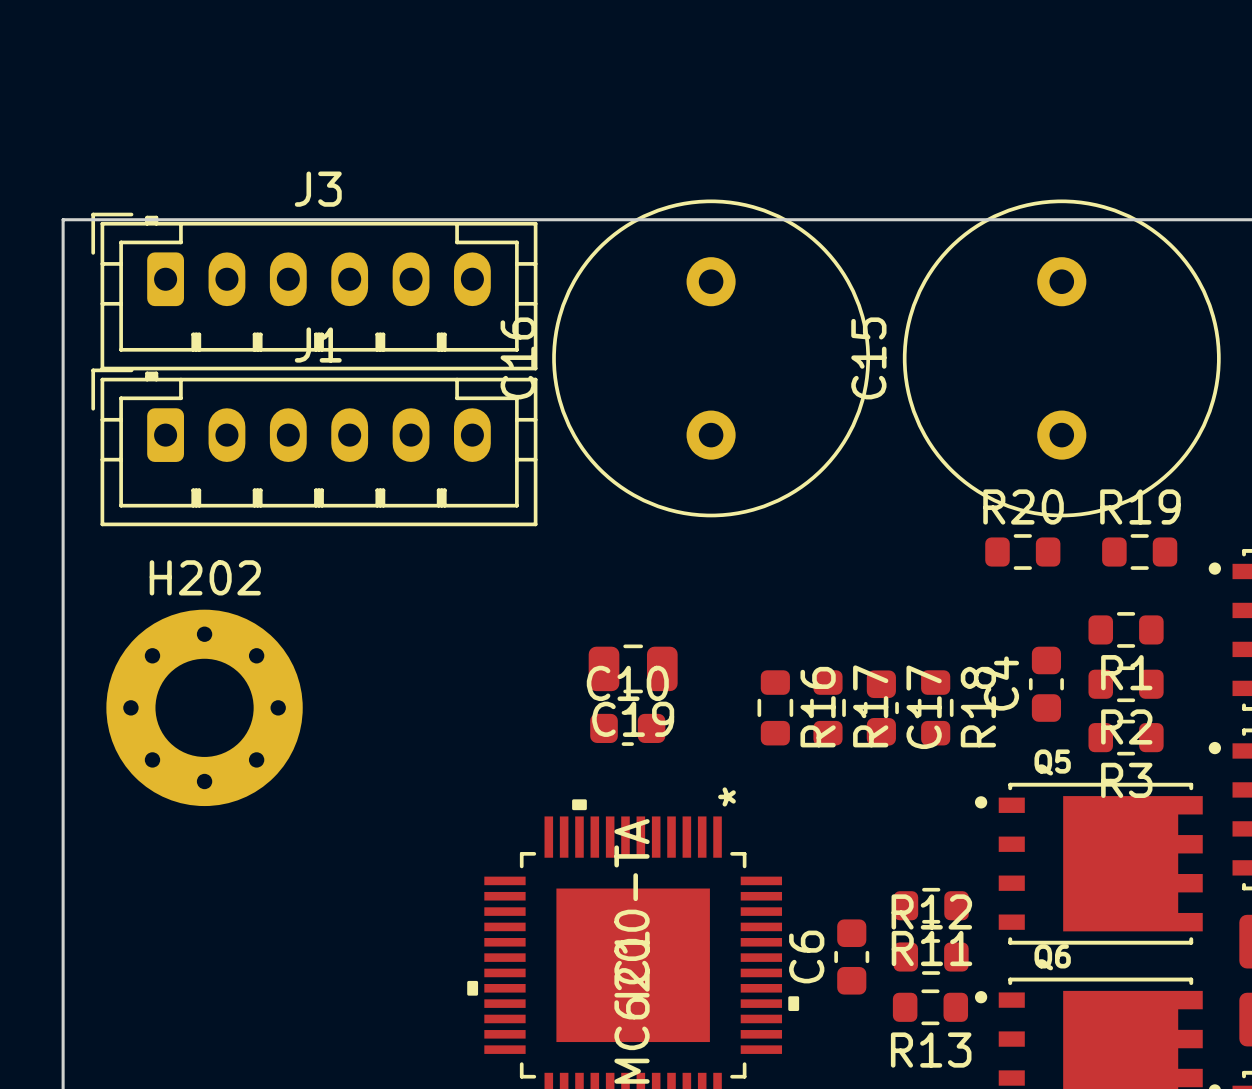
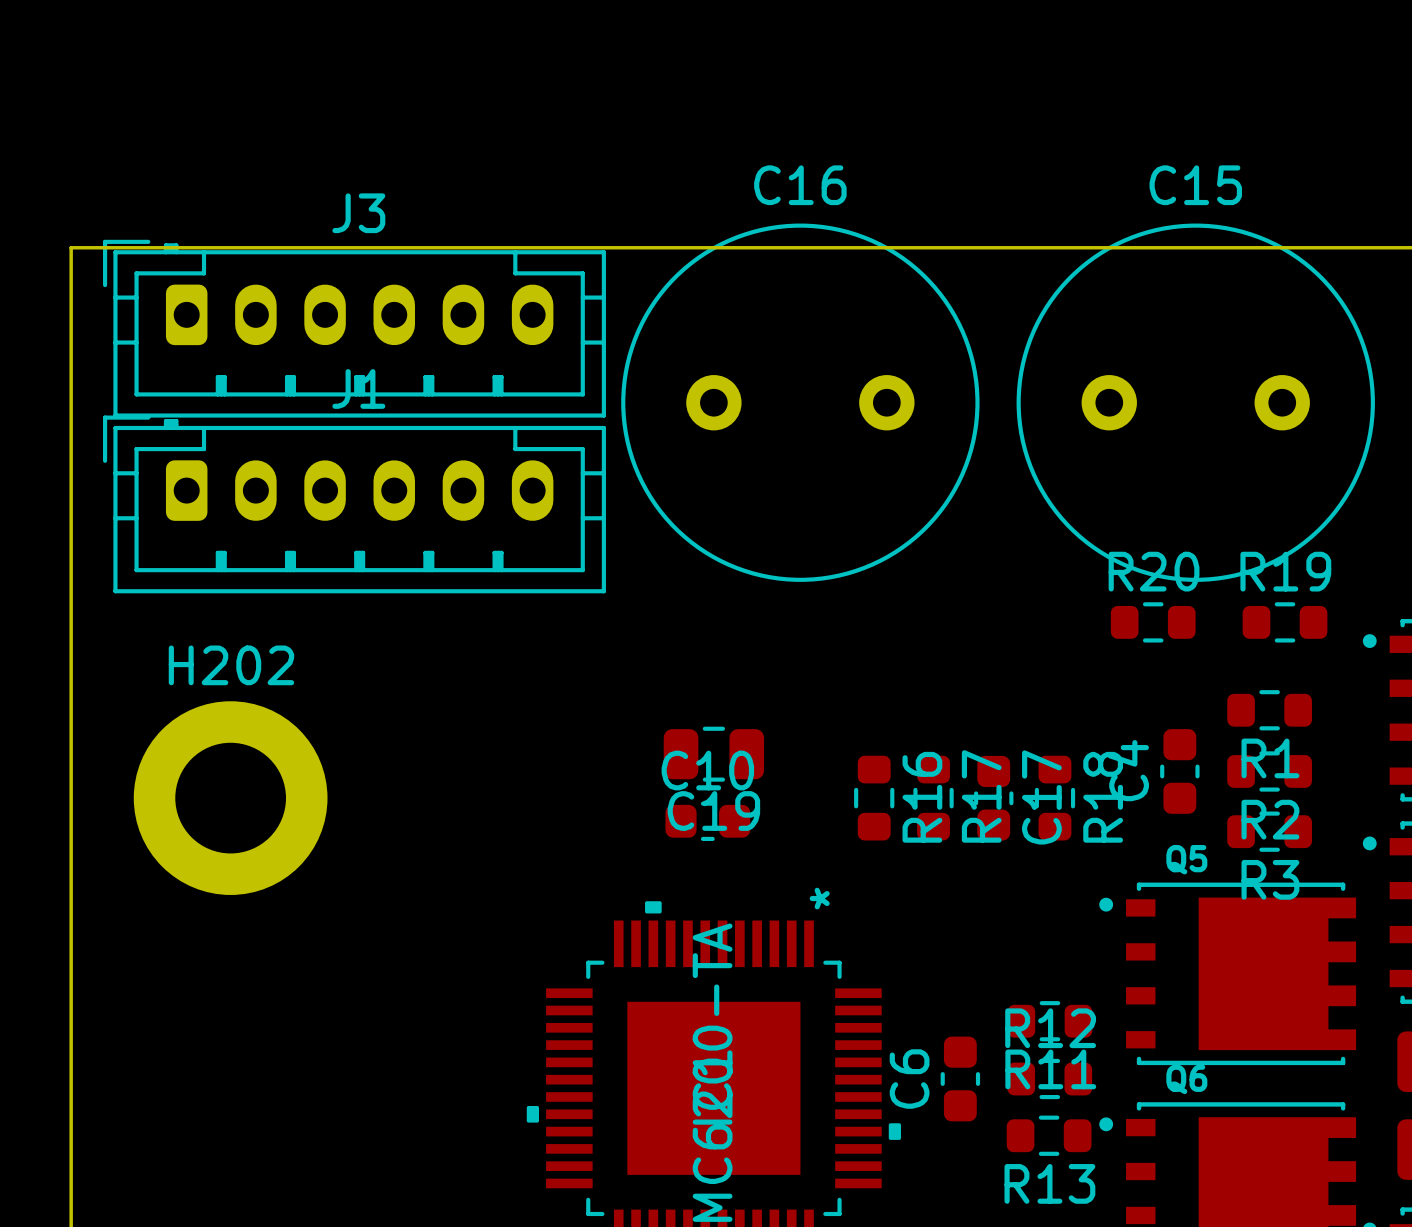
C16 rotation: 0° (711, 358) -> 90° clockwise (800, 402)
C15 rotation: 0° (1061, 358) -> 90° clockwise (1195, 402)
H202 footprint: [106, 609, 303, 807] -> [133, 701, 328, 895]

